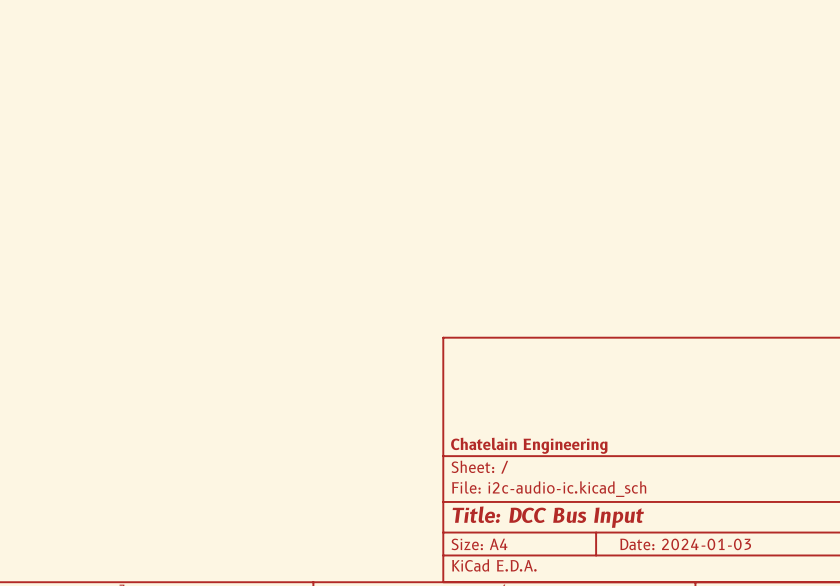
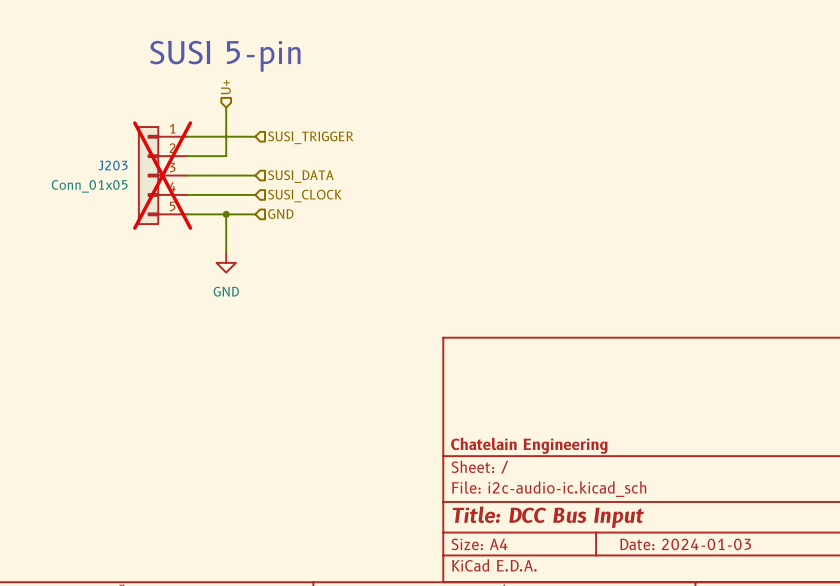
text: none -> SUSI 5-pin (225, 56)
hierarchical label: none -> U+ (225, 87)
wire: none -> (226, 107) (226, 156) (187, 156)
wire: none -> (187, 136) (255, 136)
hierarchical label: none -> SUSI_TRIGGER (310, 137)
J203: none -> Conn_01x05 (162, 175)
wire: none -> (187, 175) (255, 175)
hierarchical label: none -> SUSI_DATA (300, 176)
wire: none -> (187, 194) (255, 194)
hierarchical label: none -> SUSI_CLOCK (304, 196)
wire: none -> (187, 214) (255, 214)
wire: none -> (226, 214) (226, 253)
junction: none -> (226, 214)
hierarchical label: none -> GND (280, 214)
power symbol: none -> GND (226, 262)

